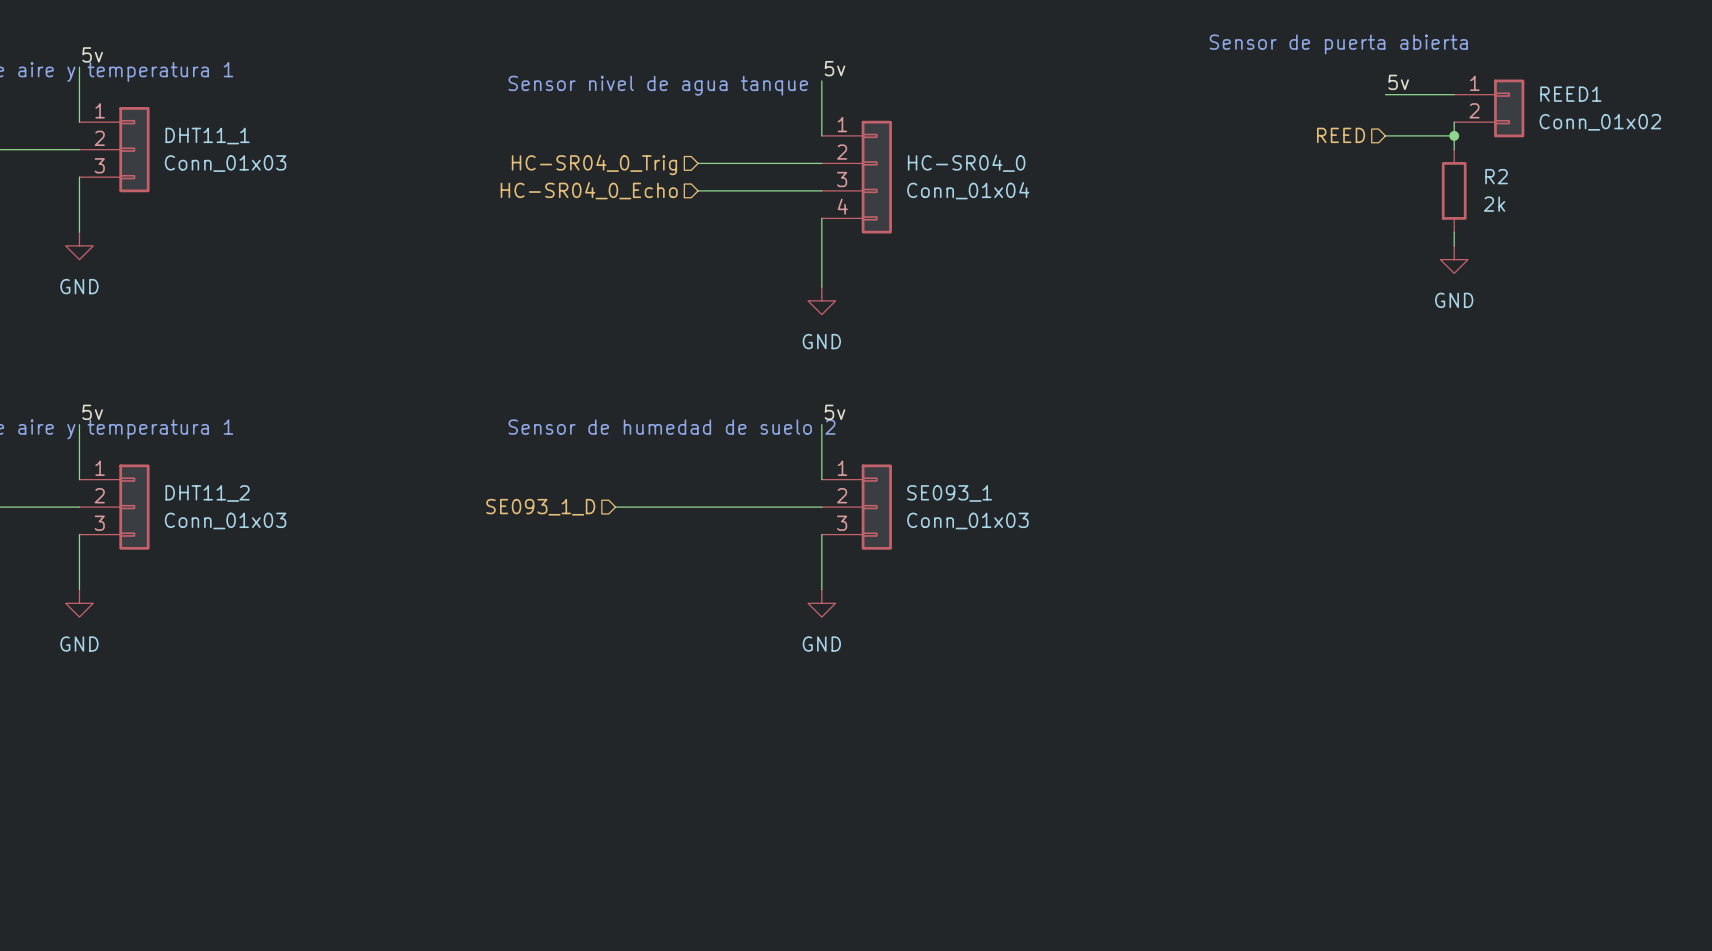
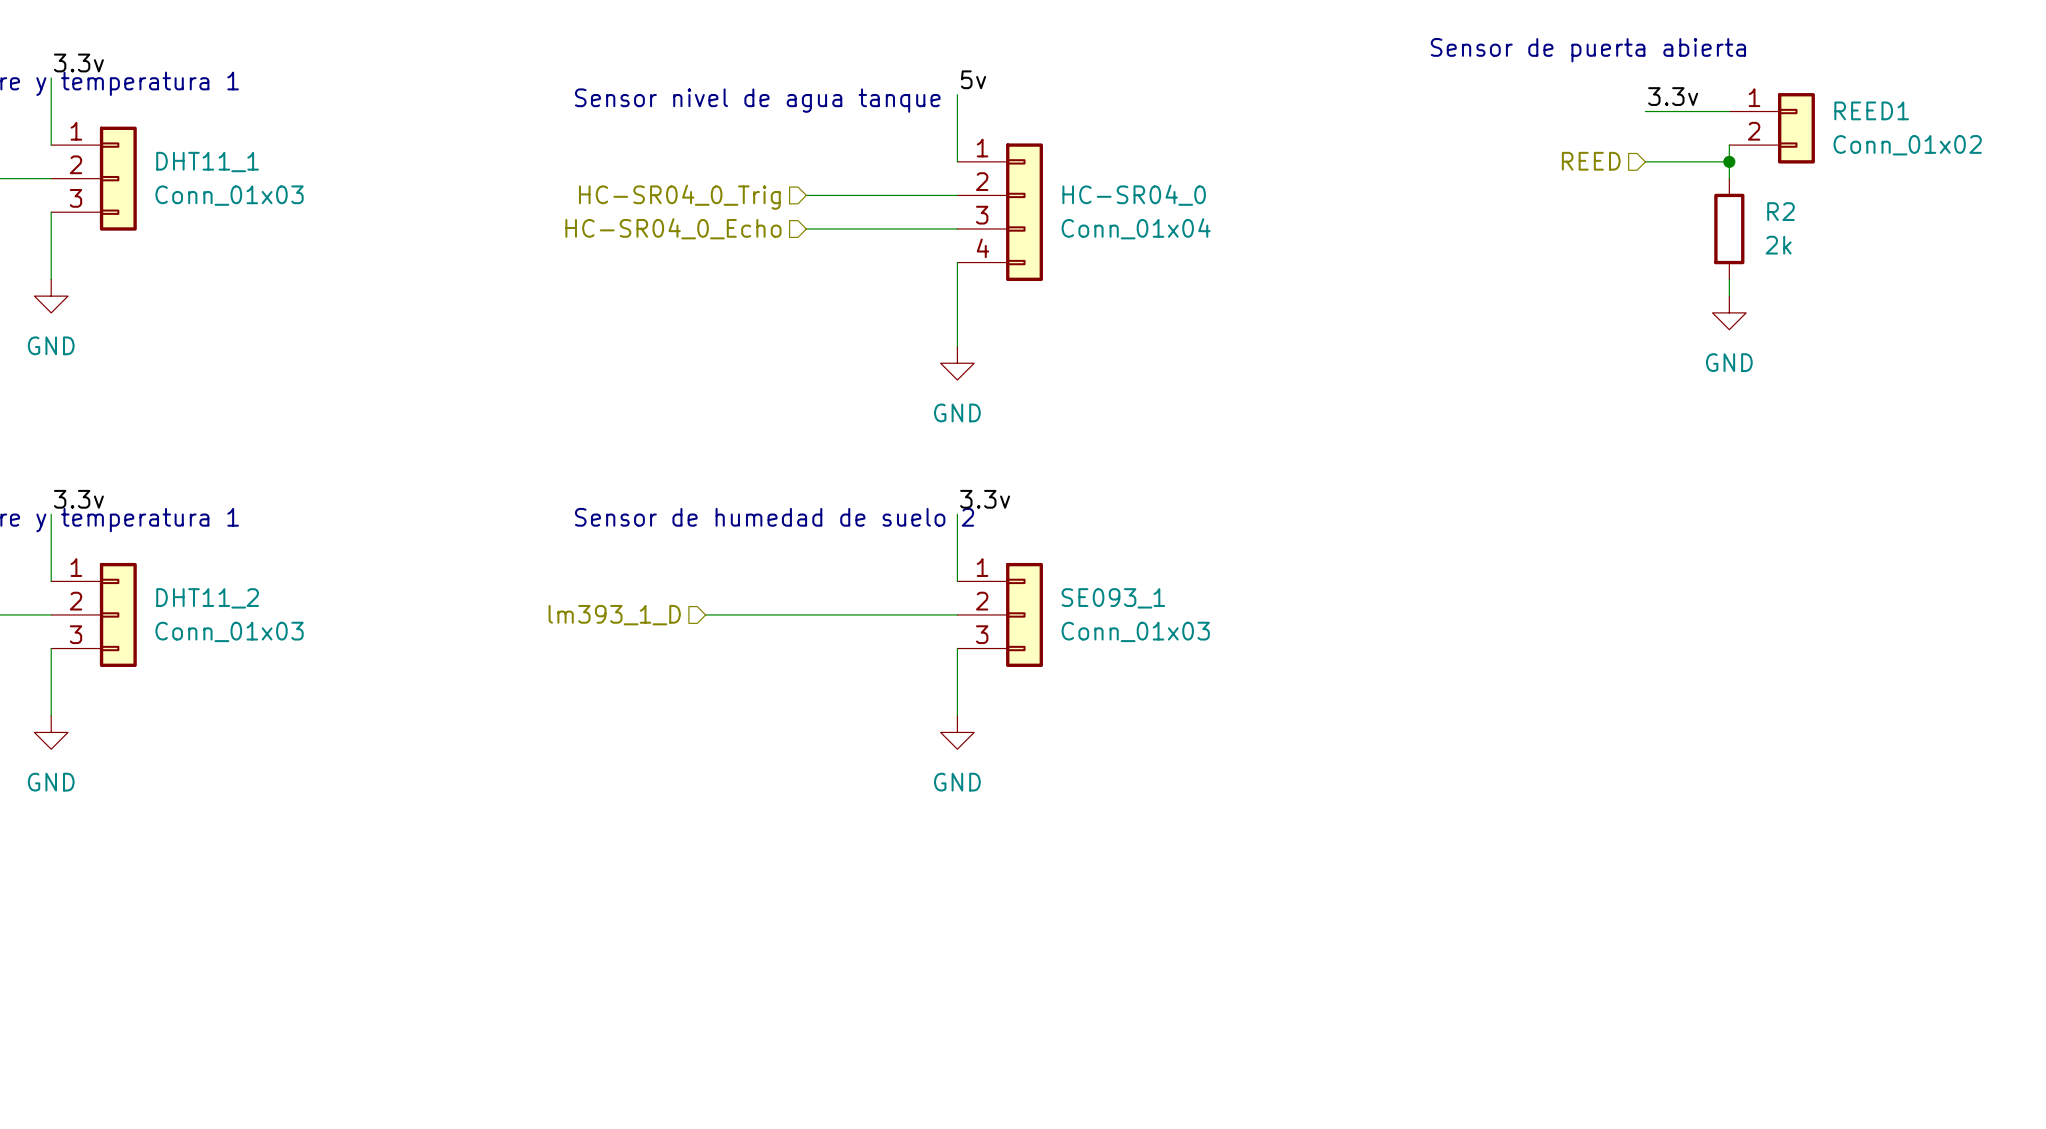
label: 5v (92, 54) -> 3.3v (78, 62)
label: 5v (1398, 82) -> 3.3v (1673, 96)
label: 5v (92, 412) -> 3.3v (78, 499)
label: 5v (835, 412) -> 3.3v (985, 499)
hierarchical label: SE093_1_D (540, 507) -> lm393_1_D (614, 615)

